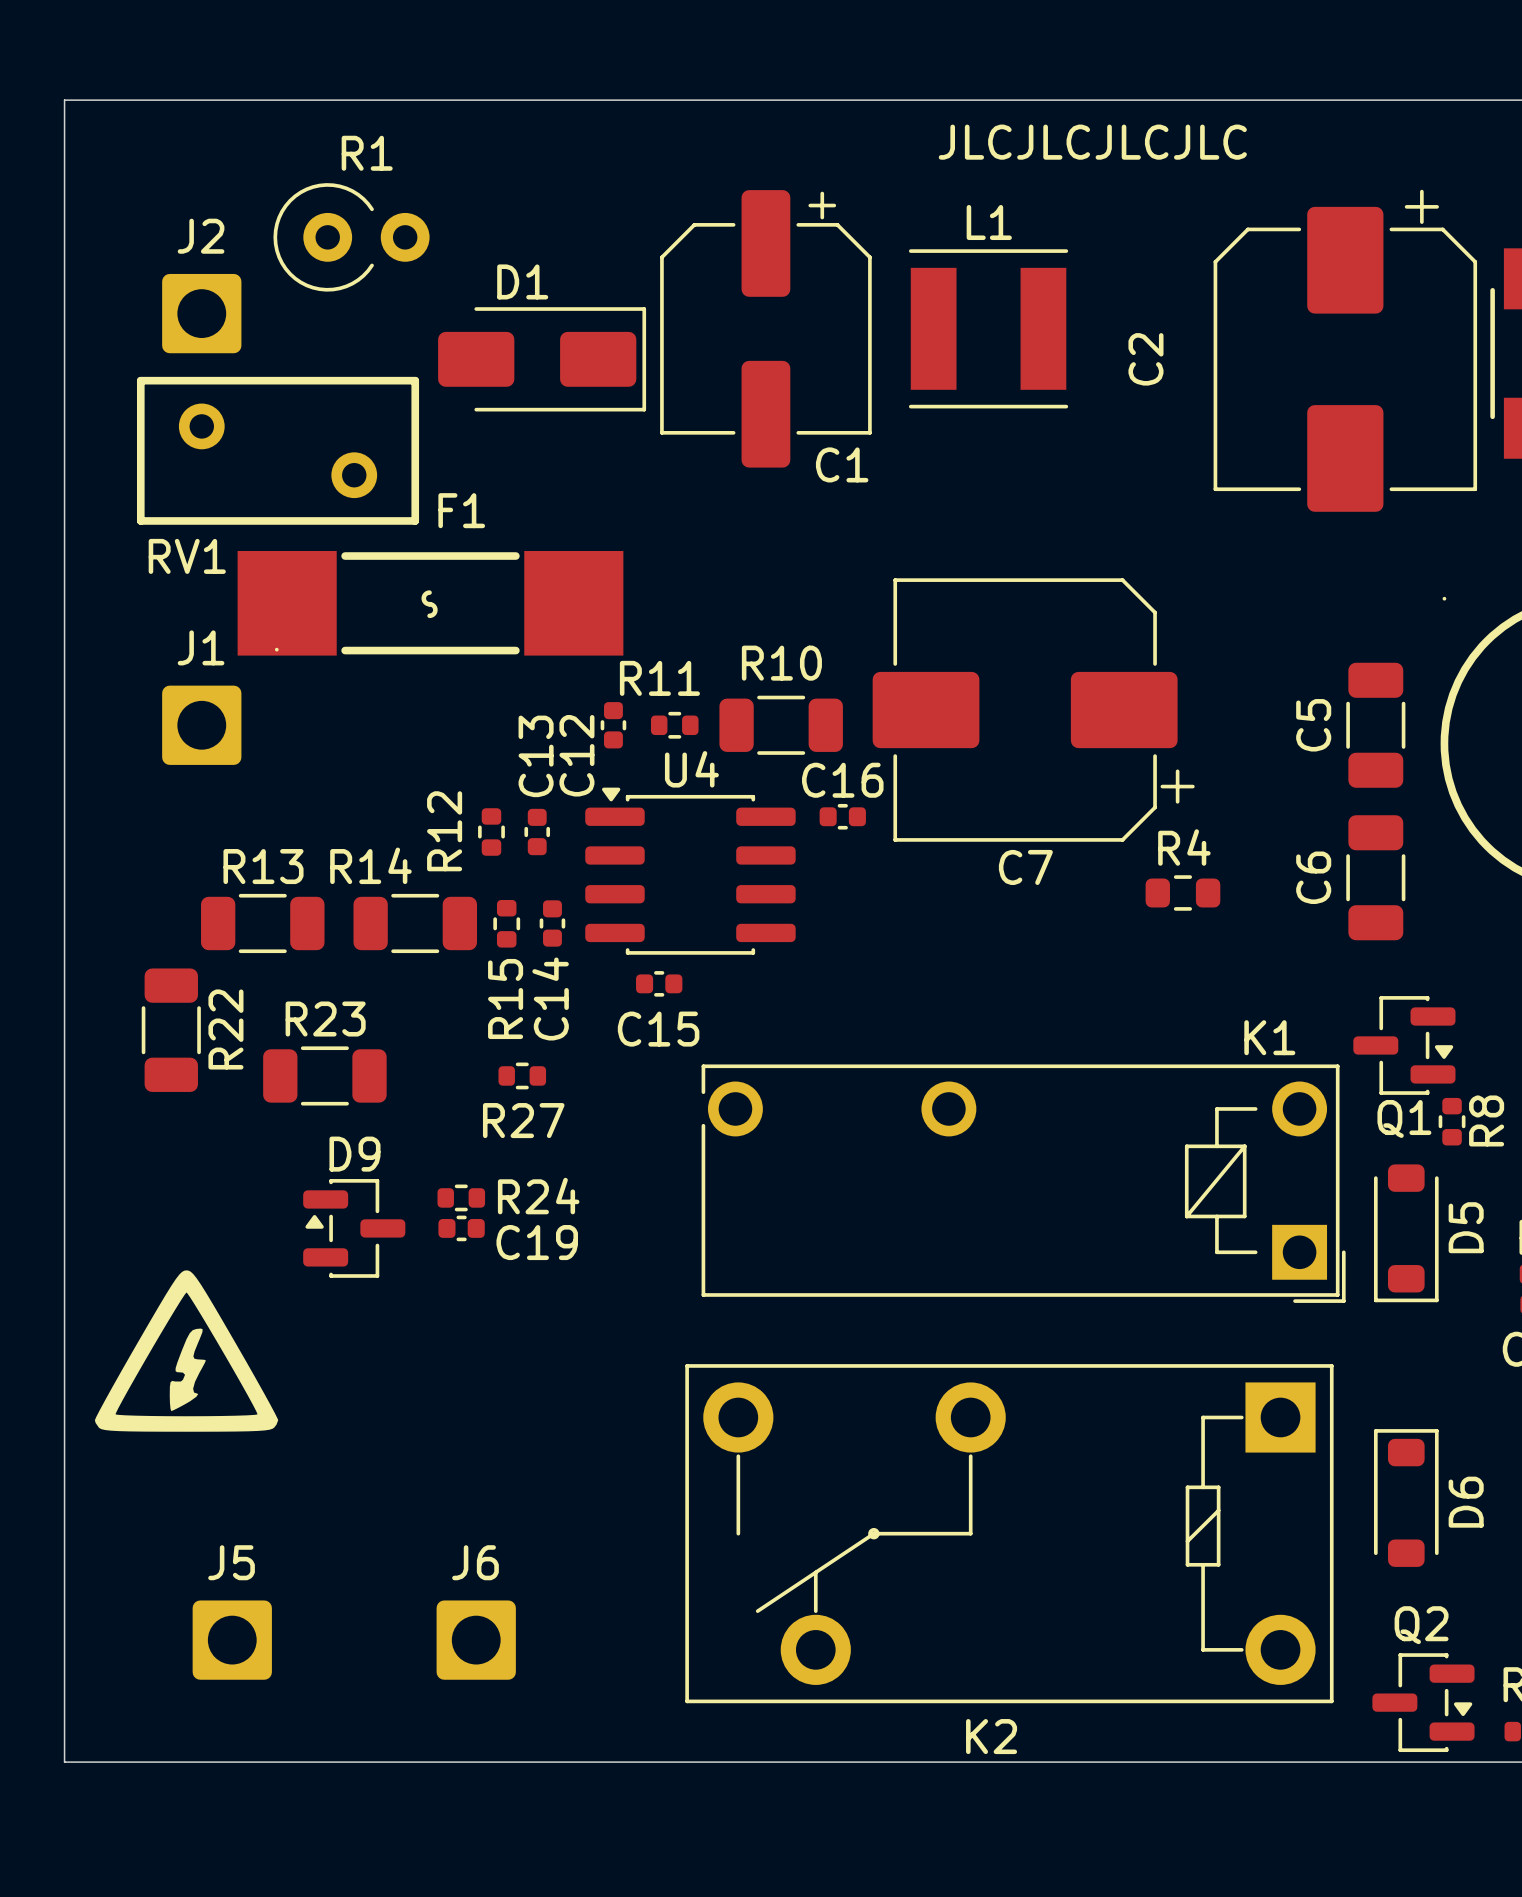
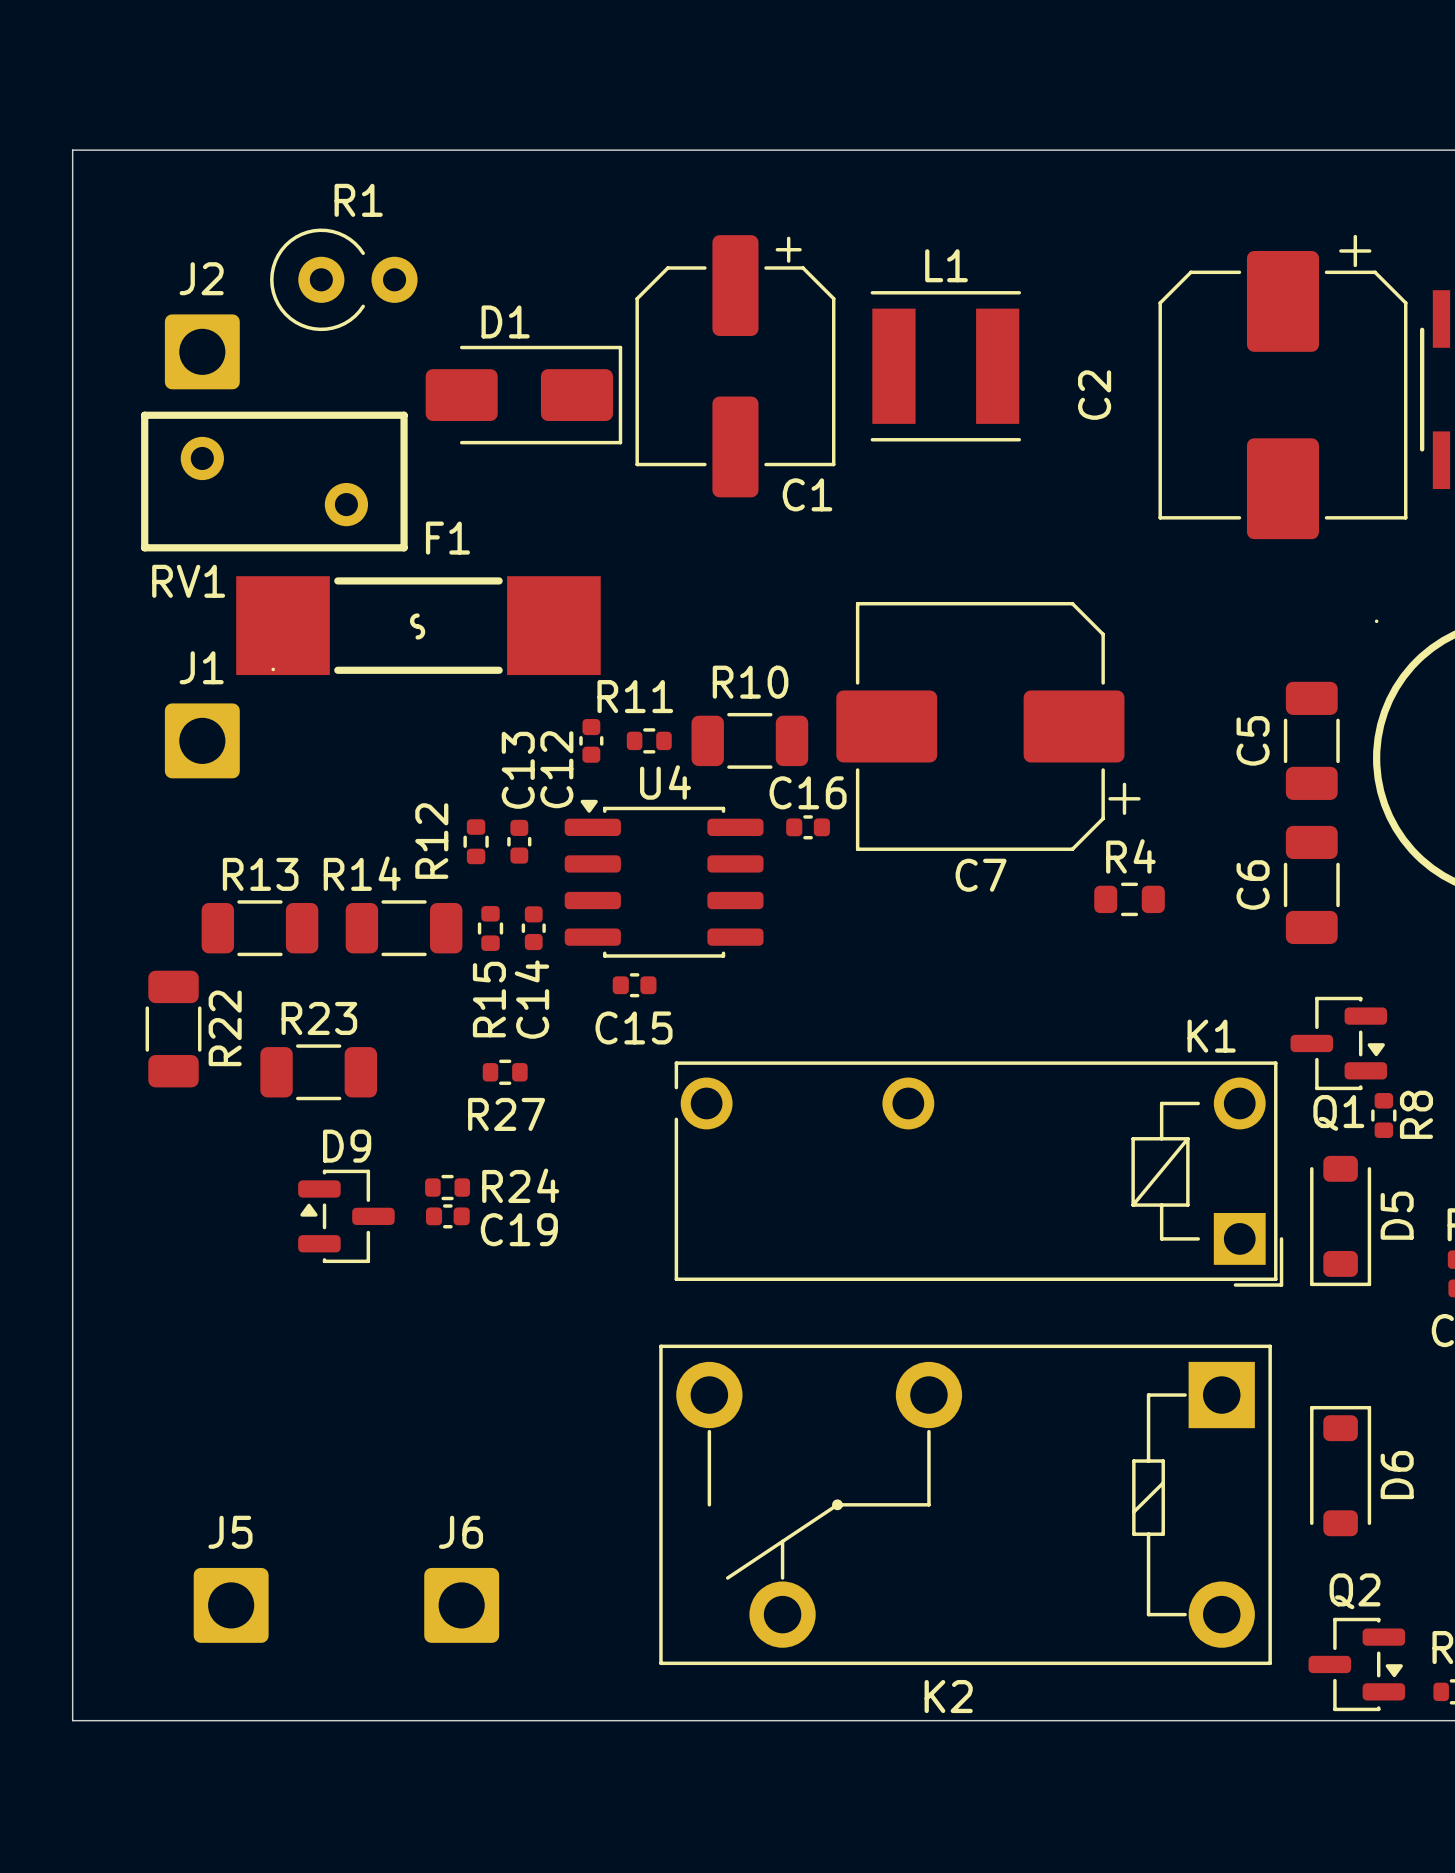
text: JLCJLCJLCJLC (1092, 142) -> none
drawing: [94, 1270, 279, 1432] -> none

